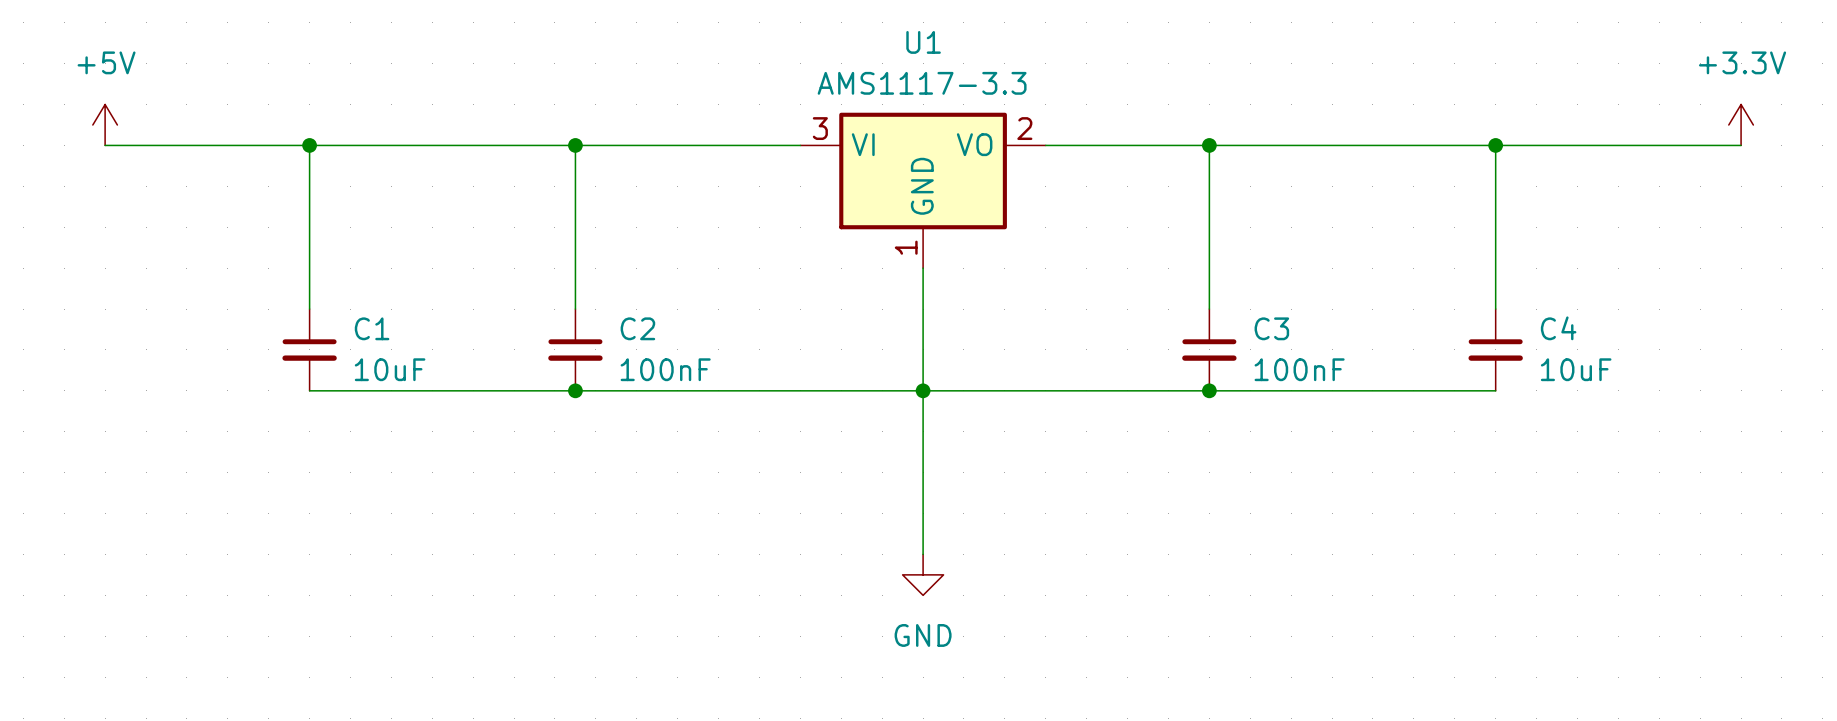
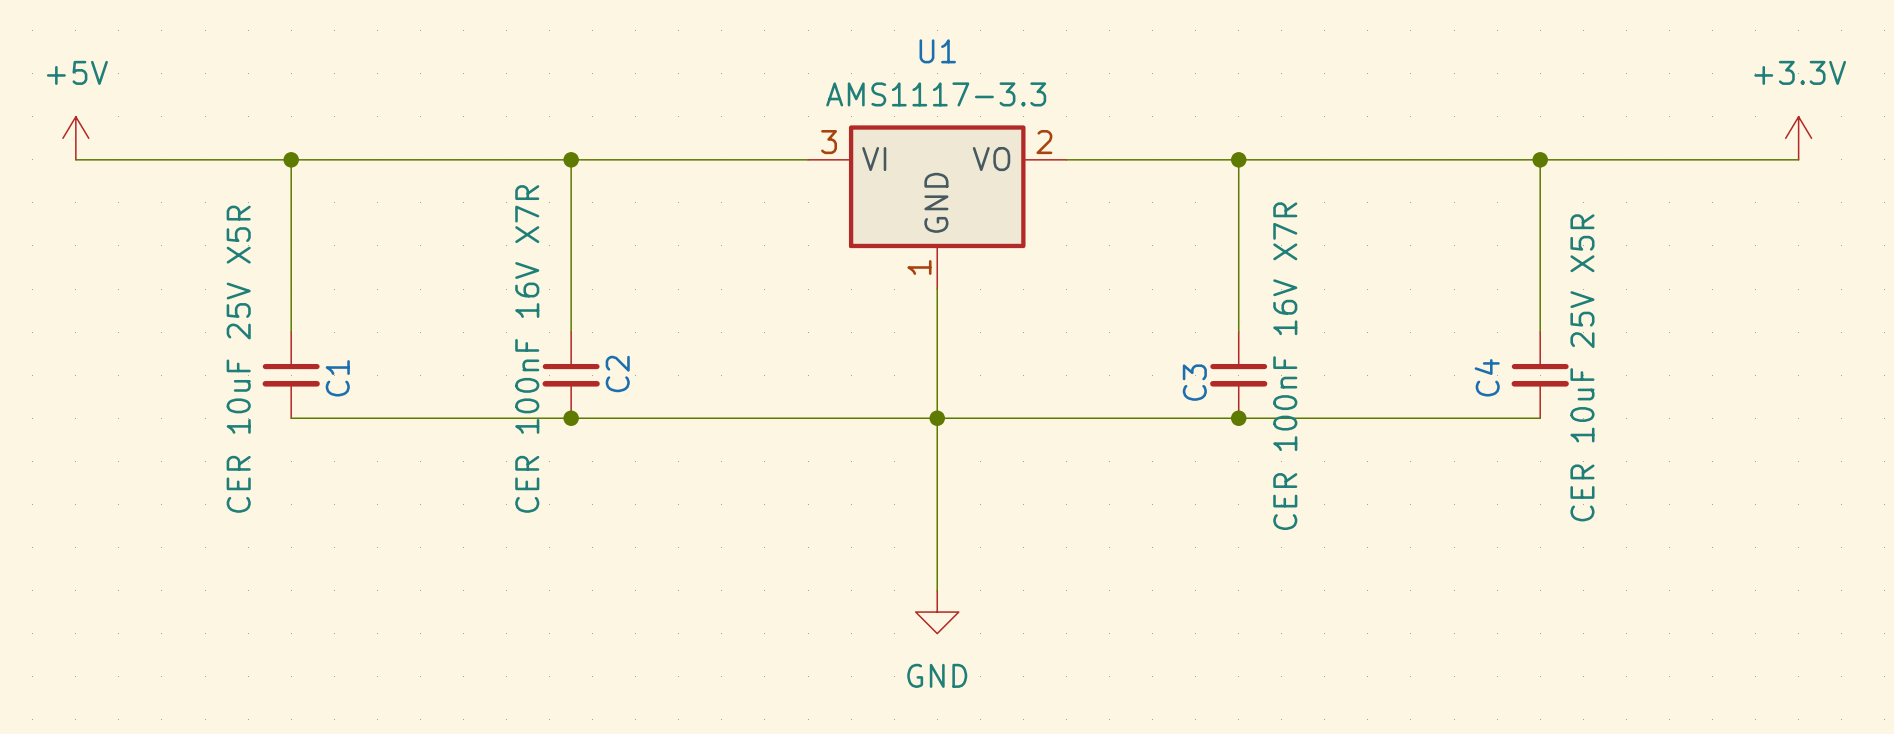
C1 name rotation: 0° (372, 328) -> 90° counterclockwise (337, 378)
C2 name rotation: 0° (637, 328) -> 90° counterclockwise (617, 373)
C3 name rotation: 0° (1271, 328) -> 90° counterclockwise (1194, 382)
C3 name position: C3 (1271, 328) -> C3 (1194, 382)
C4 name rotation: 0° (1558, 328) -> 90° counterclockwise (1487, 377)
C4 name position: C4 (1558, 328) -> C4 (1487, 377)
C1 value: 10uF (390, 369) -> CER 10uF 25V X5R (238, 359)
C2 value: 100nF (665, 369) -> CER 100nF 16V X7R (527, 348)
C3 value: 100nF (1299, 369) -> CER 100nF 16V X7R (1285, 366)
C4 value: 10uF (1576, 369) -> CER 10uF 25V X5R (1582, 367)

